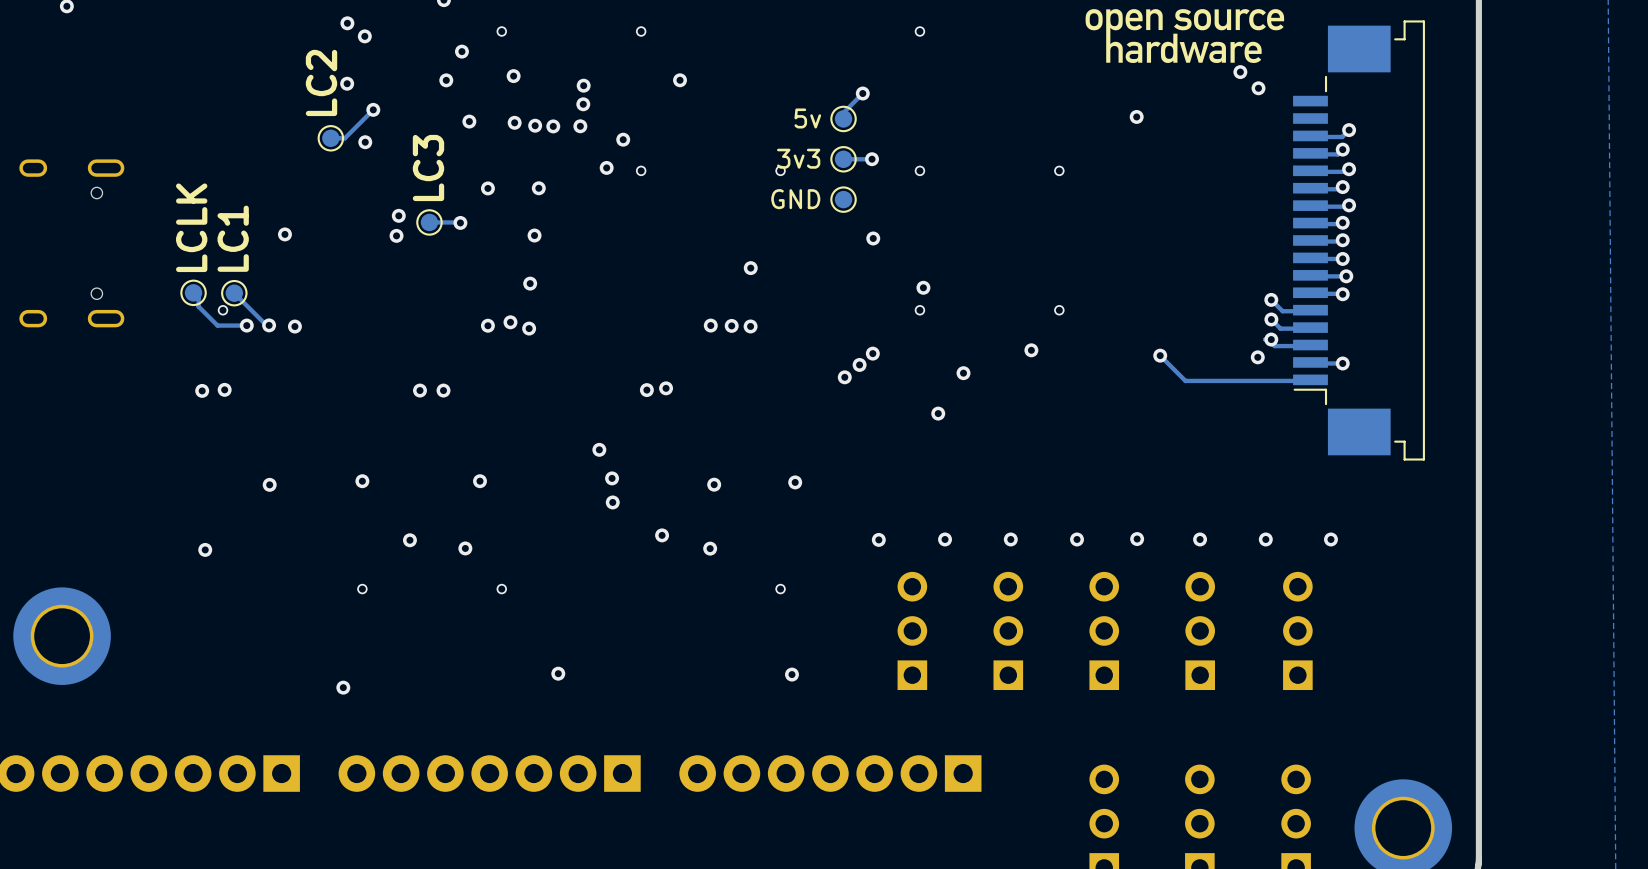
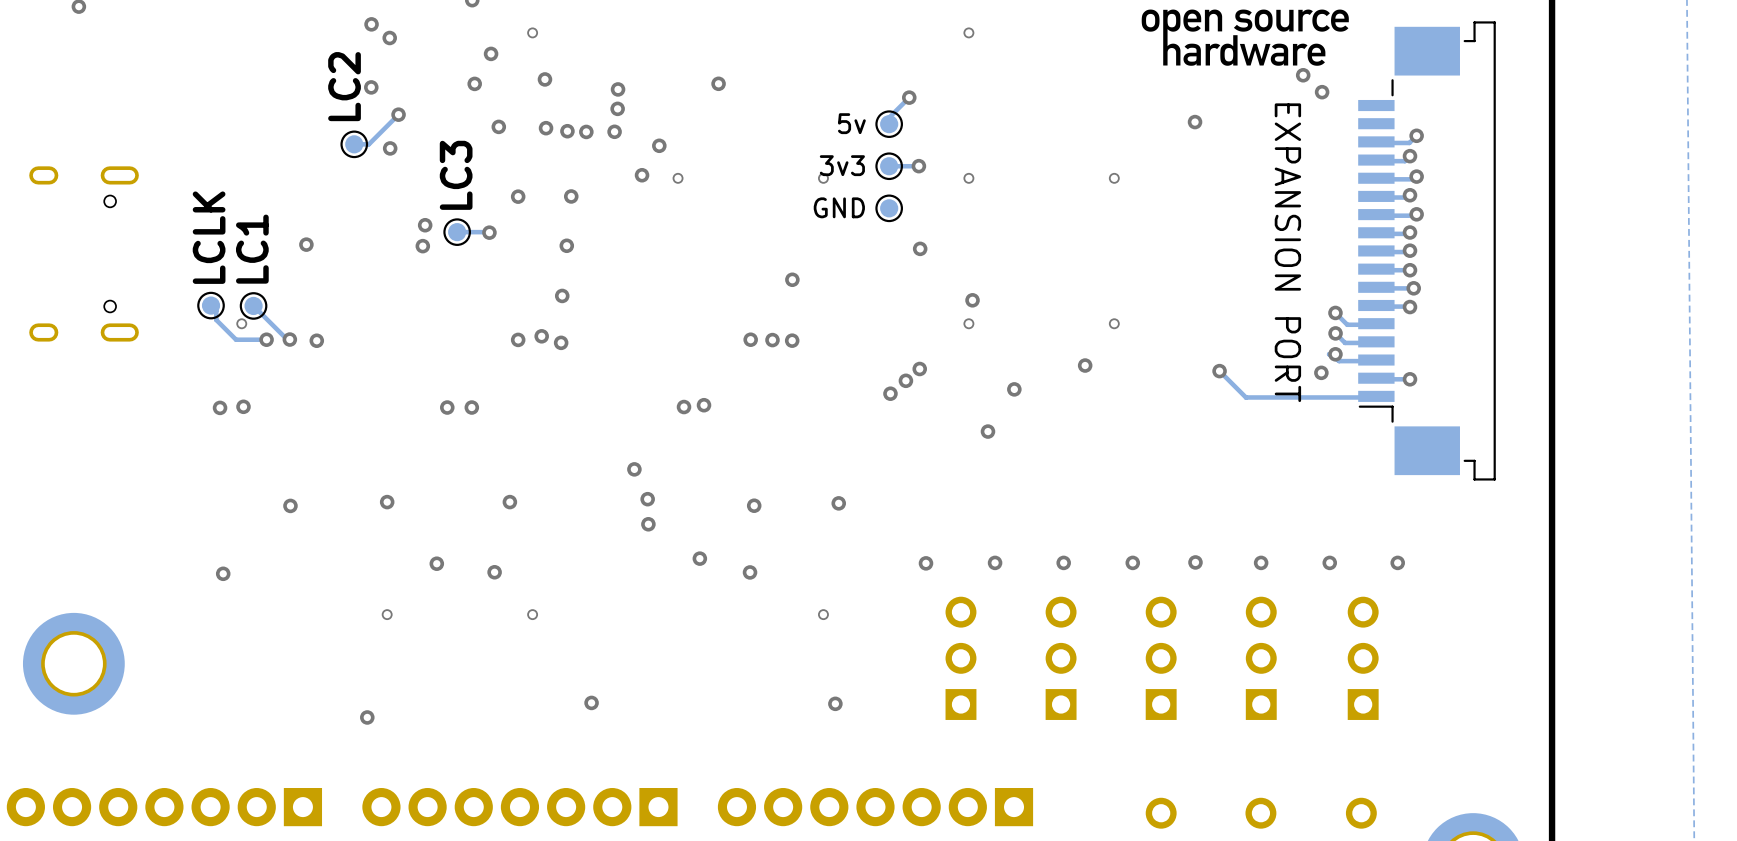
via: (641, 31) -> none
text: none -> EXPANSION PORT (1287, 252)

